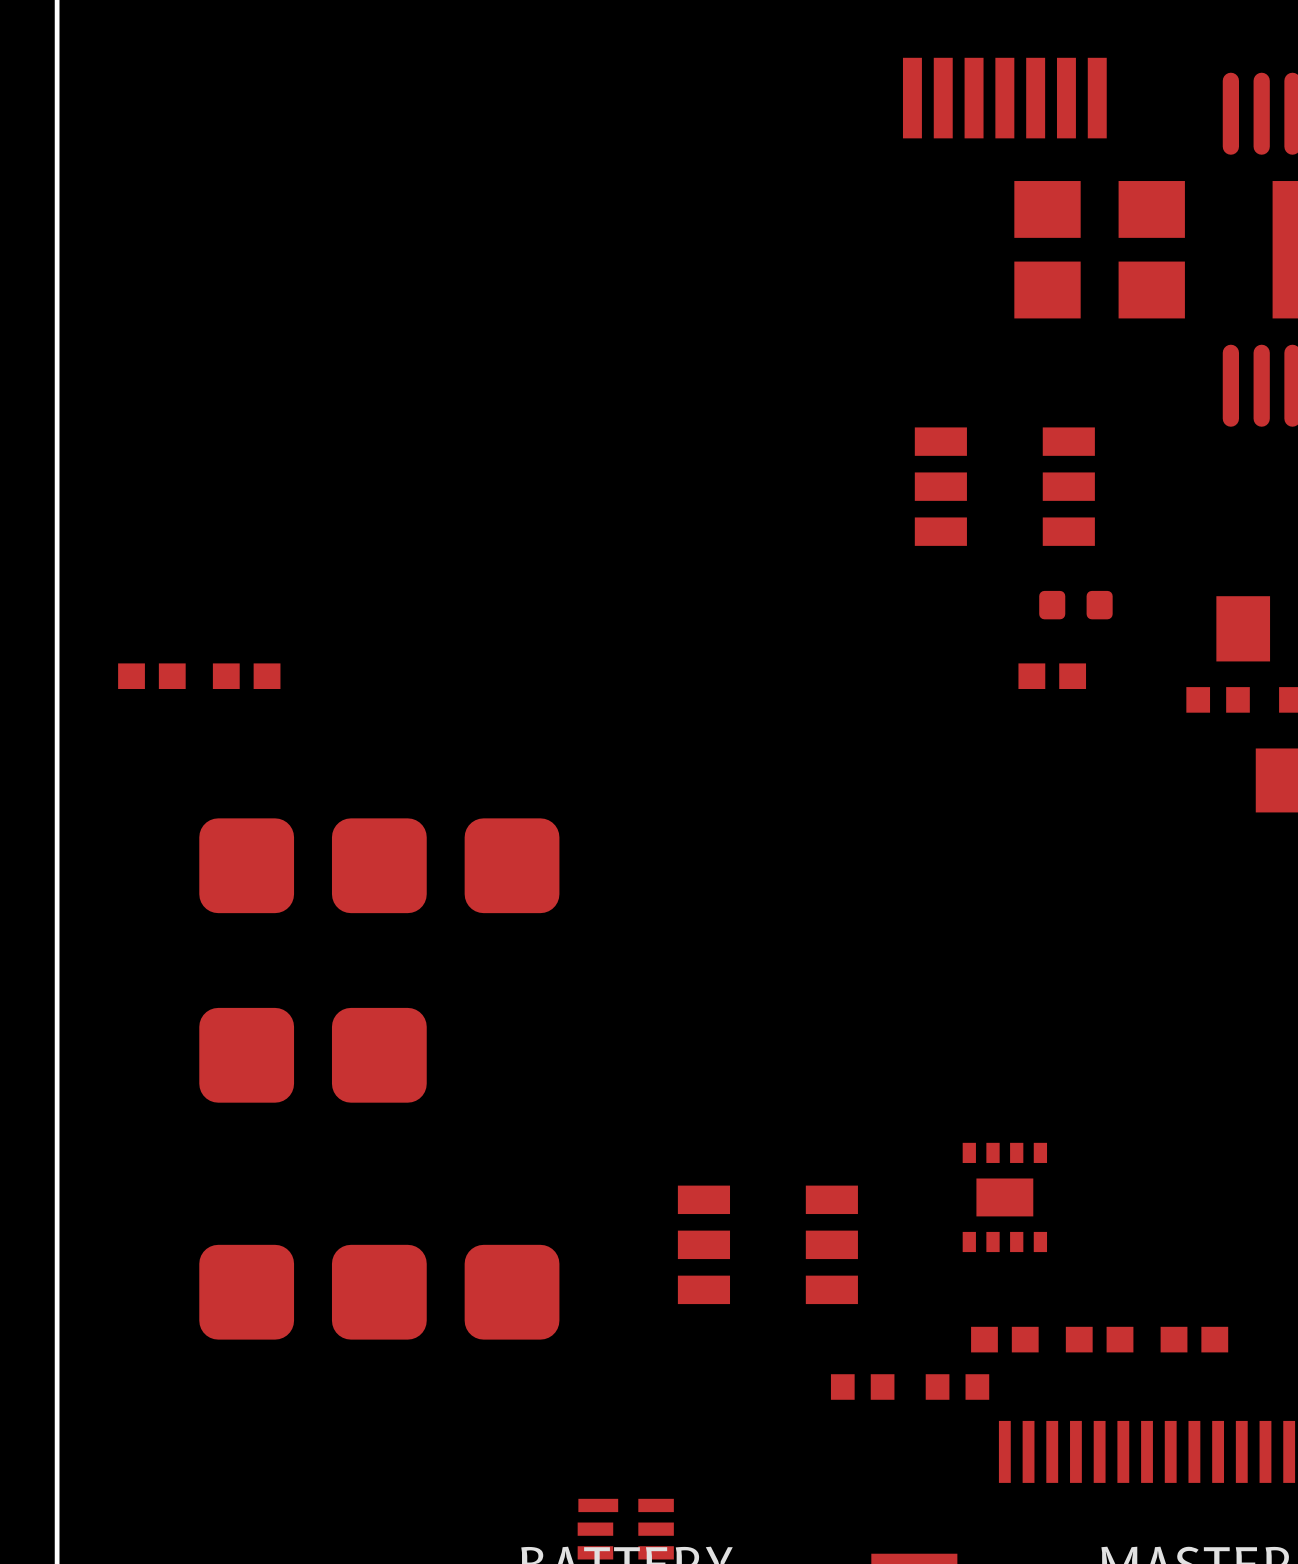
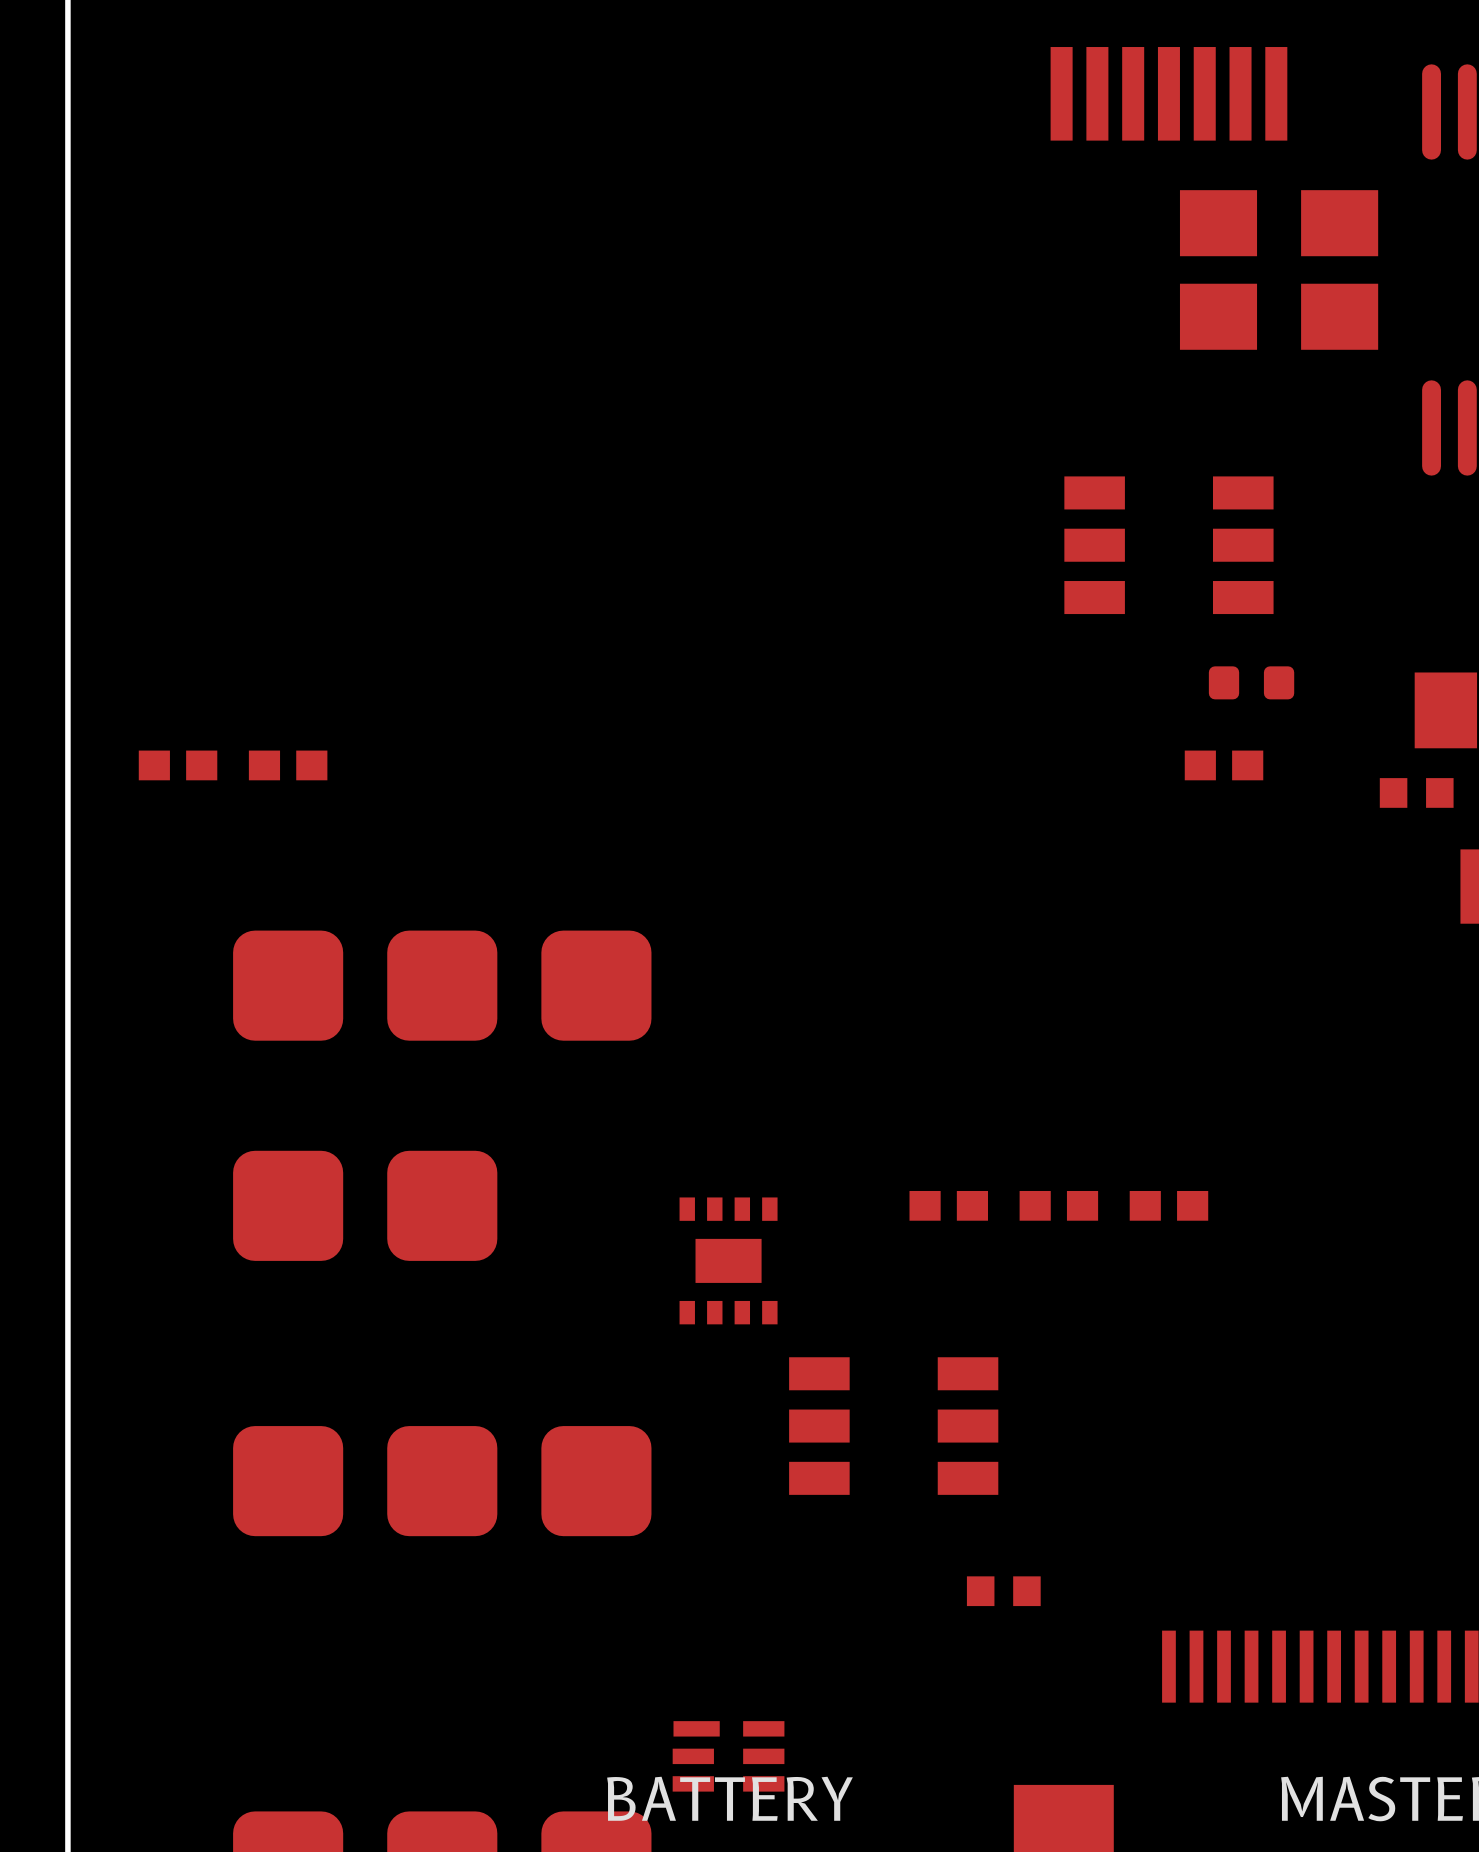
part: none -> (948, 1205)
part: none -> (1058, 1205)
part: none -> (1168, 1205)
part position: (1004, 1197) -> (728, 1260)
part: (1004, 1339) -> none
part: (1099, 1339) -> none
part: (1194, 1339) -> none
part: (957, 1387) -> none

